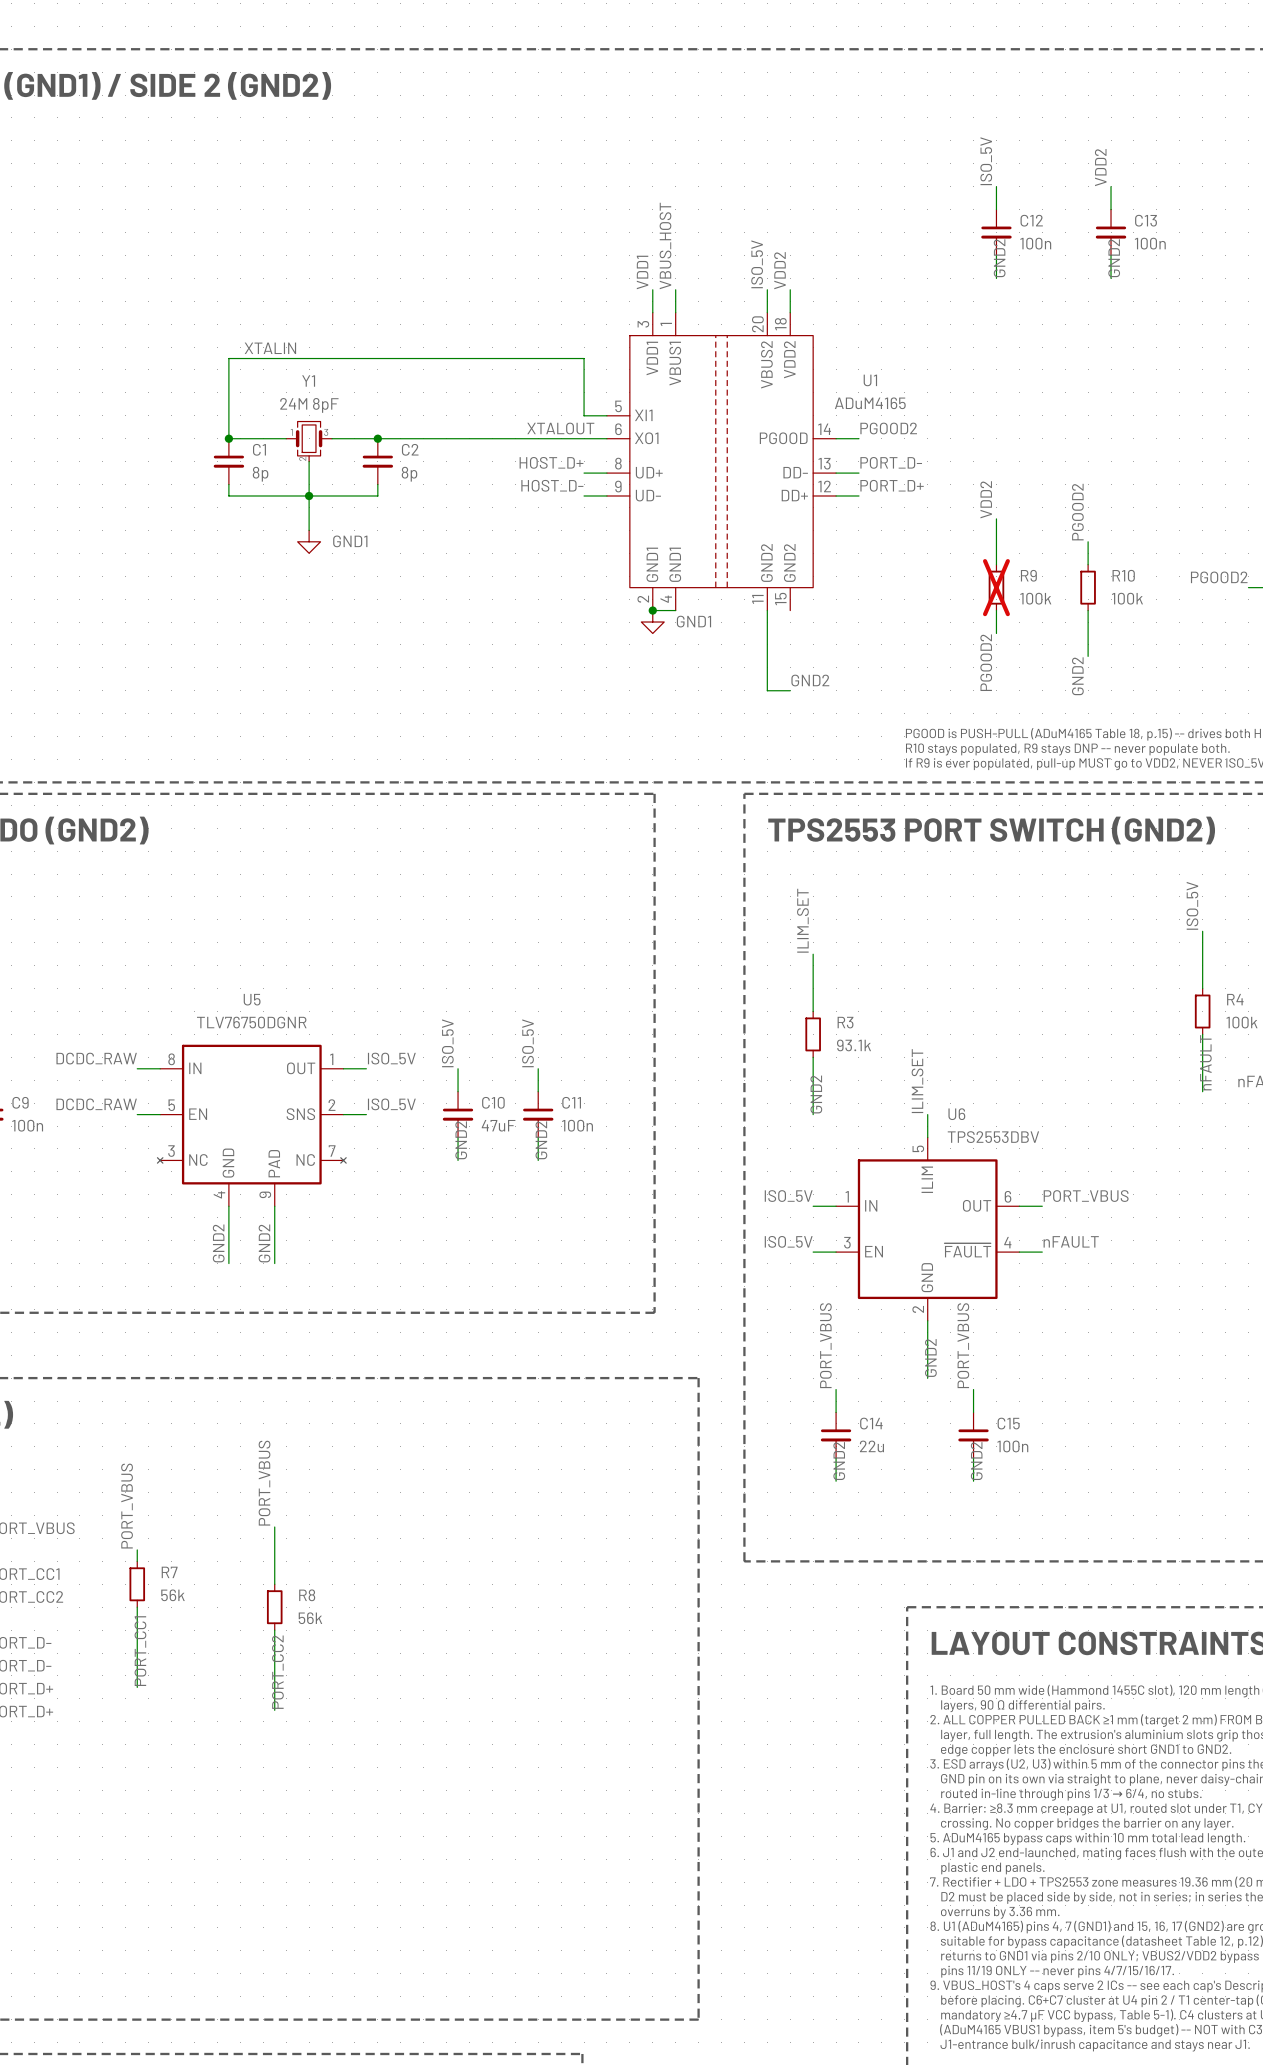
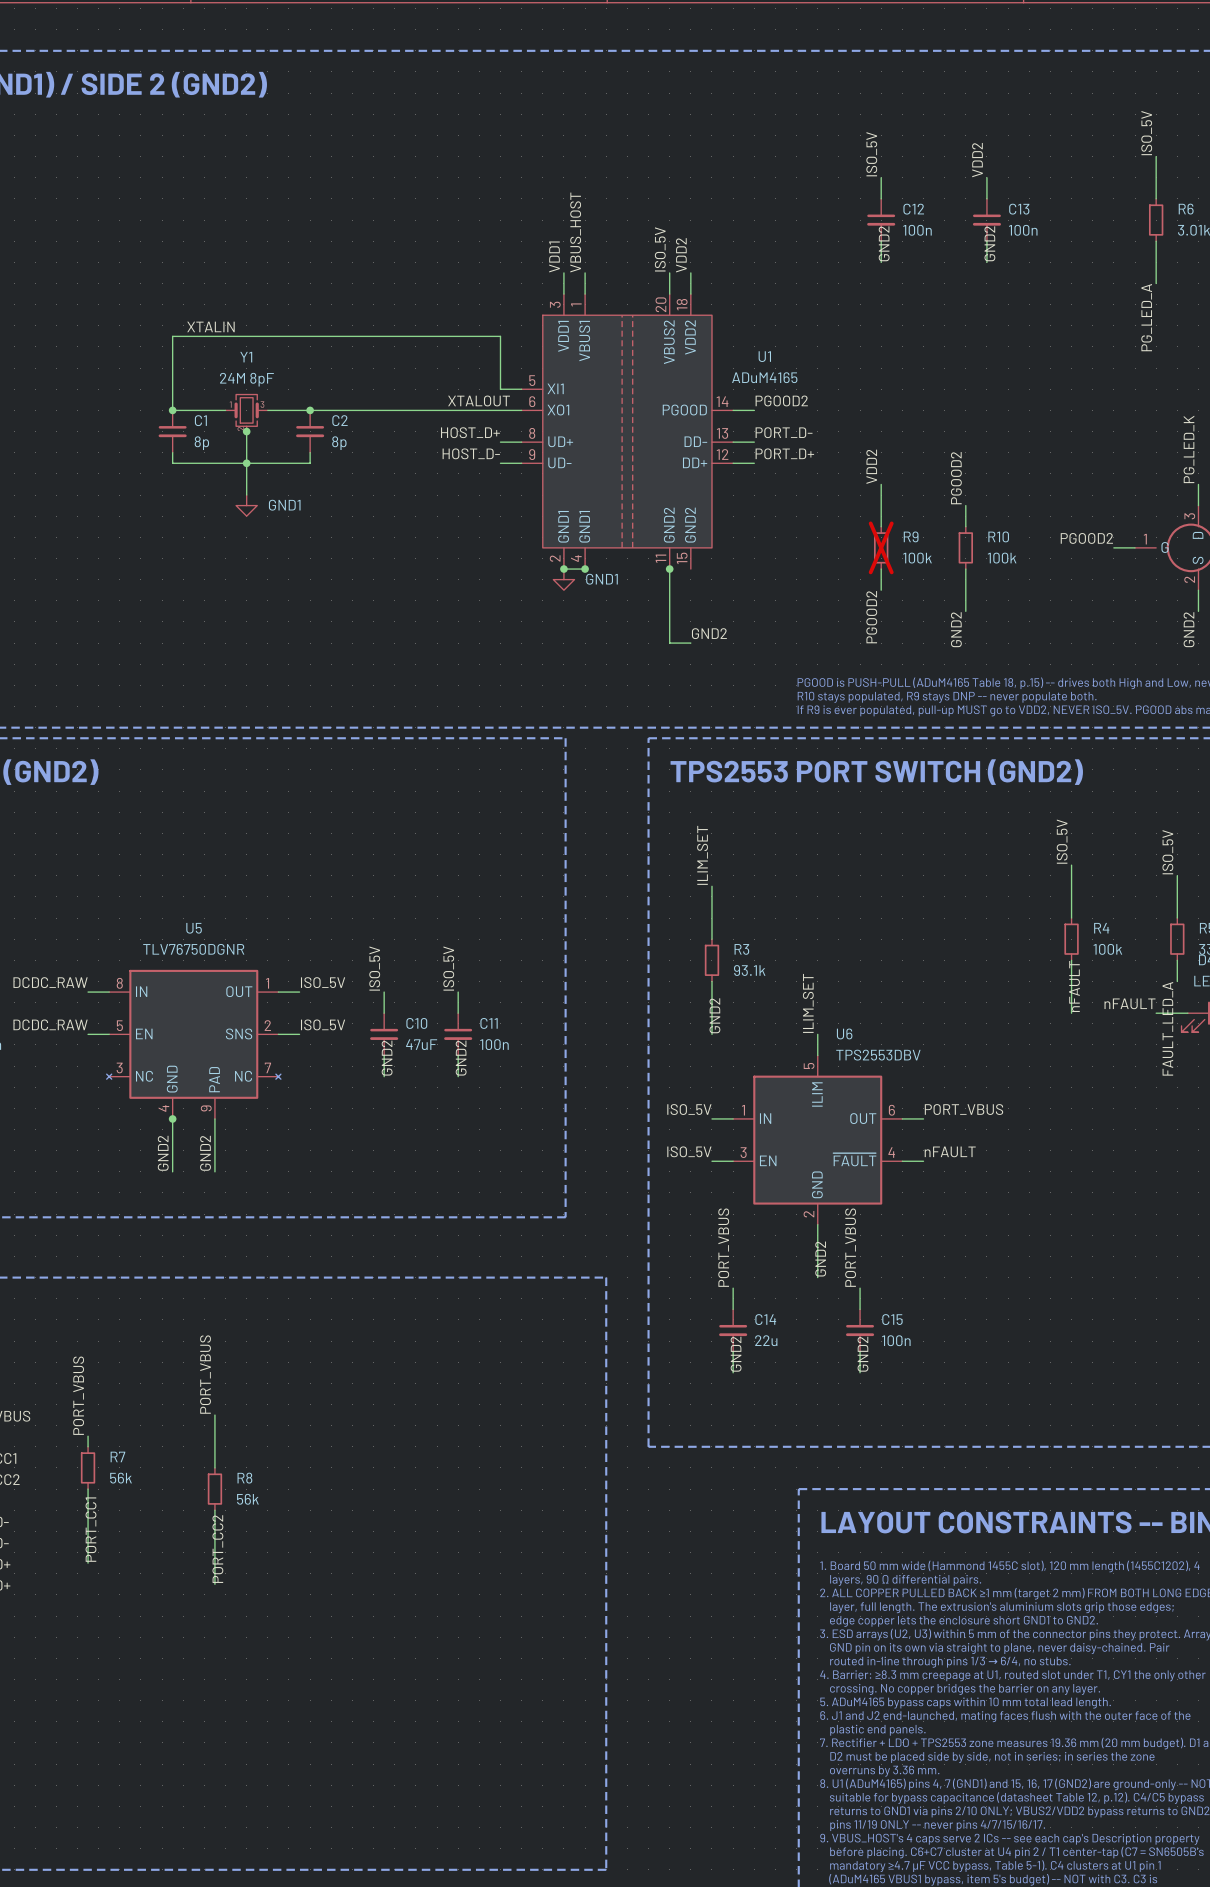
junction: none -> (246, 431)
junction: none -> (585, 569)
junction: none -> (669, 569)
junction: none -> (172, 1118)

